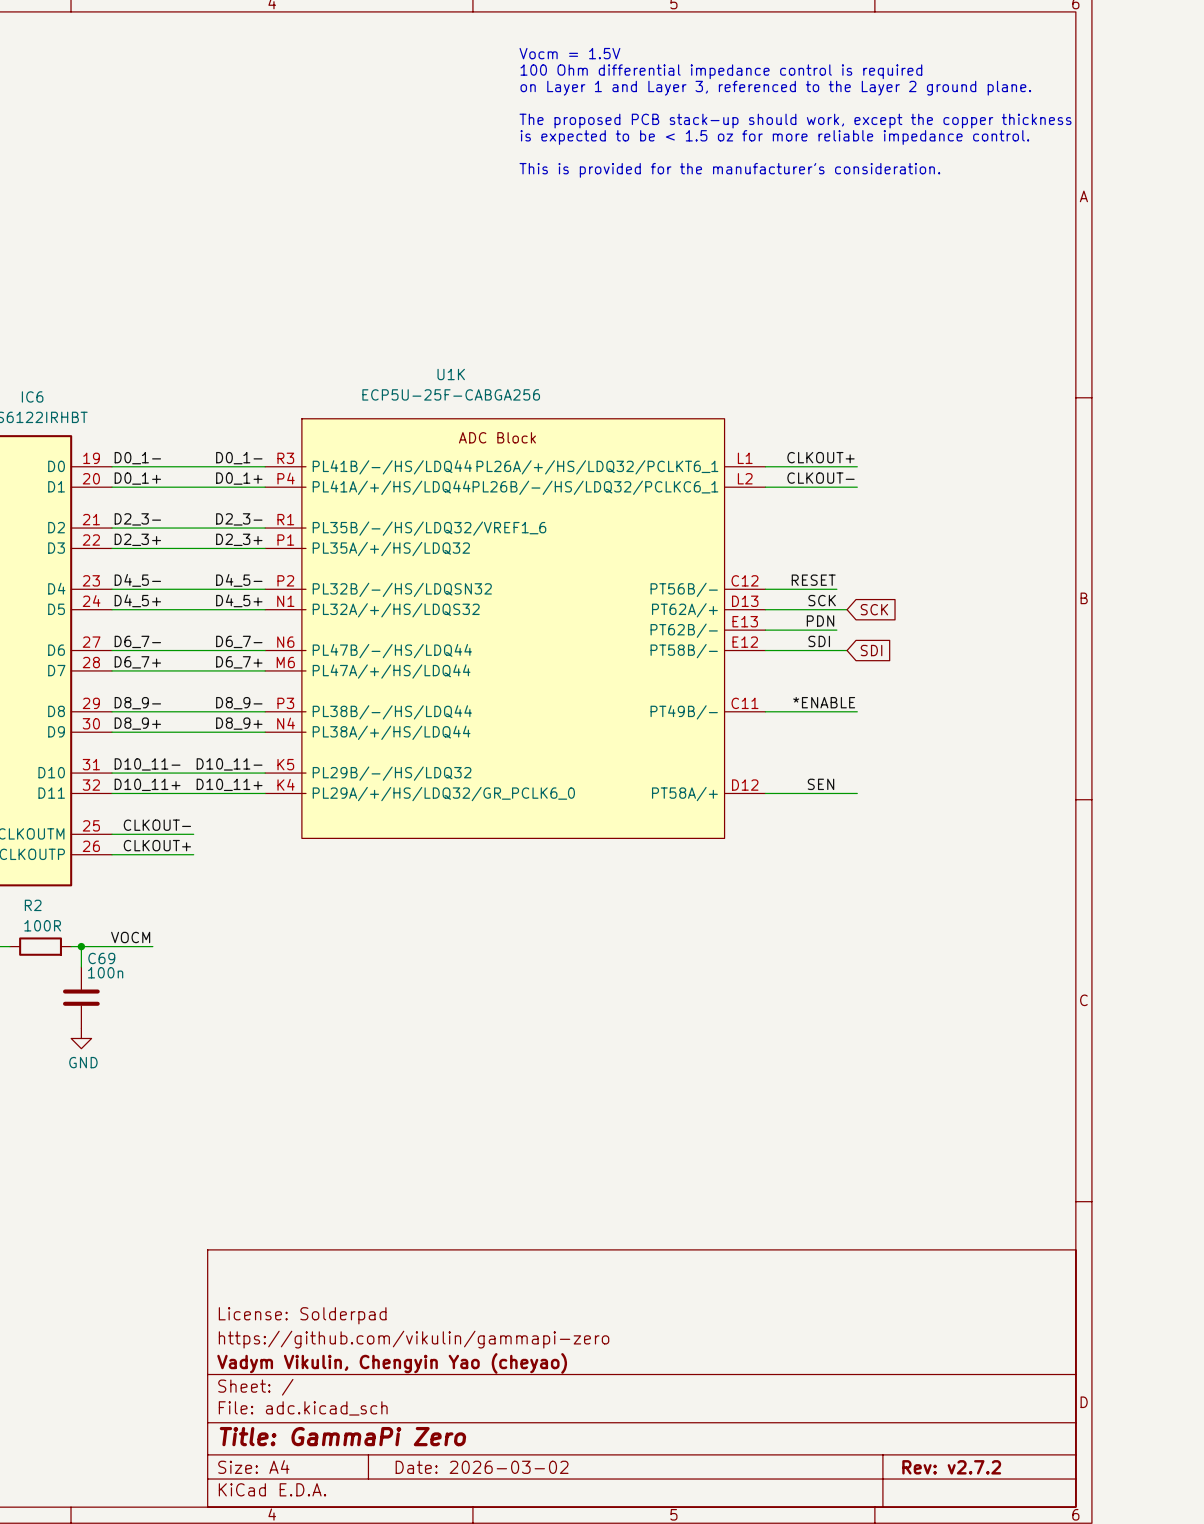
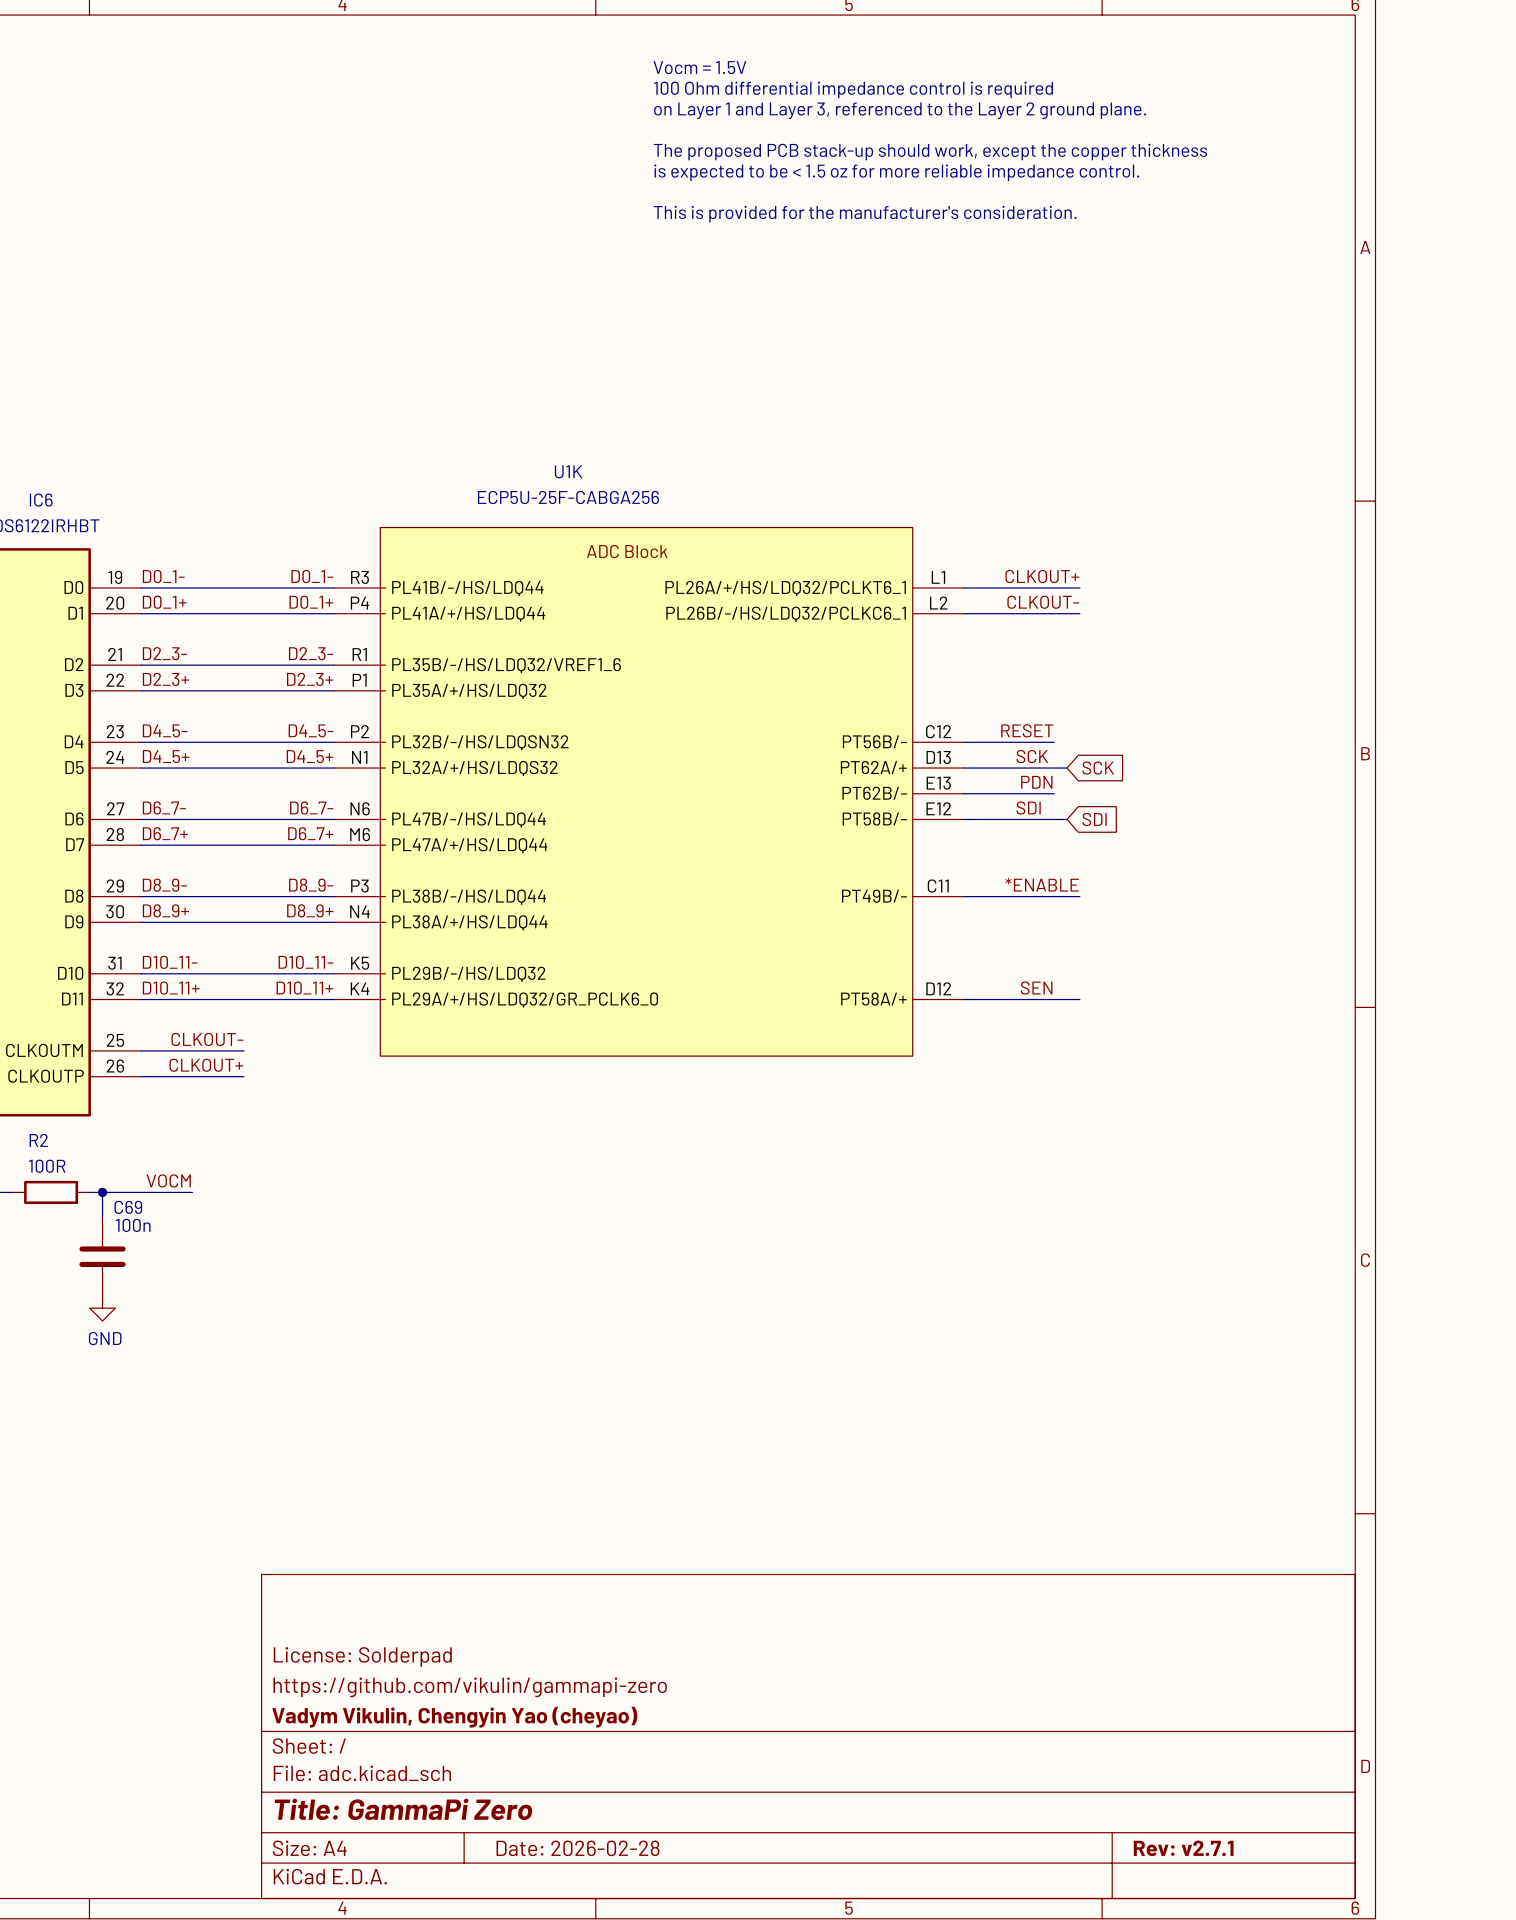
title block: Date: 2026-03-02 (482, 1467) -> Date: 2026-02-28 (578, 1848)
title block: Rev: v2.7.2 (951, 1467) -> Rev: v2.7.1 (1183, 1848)

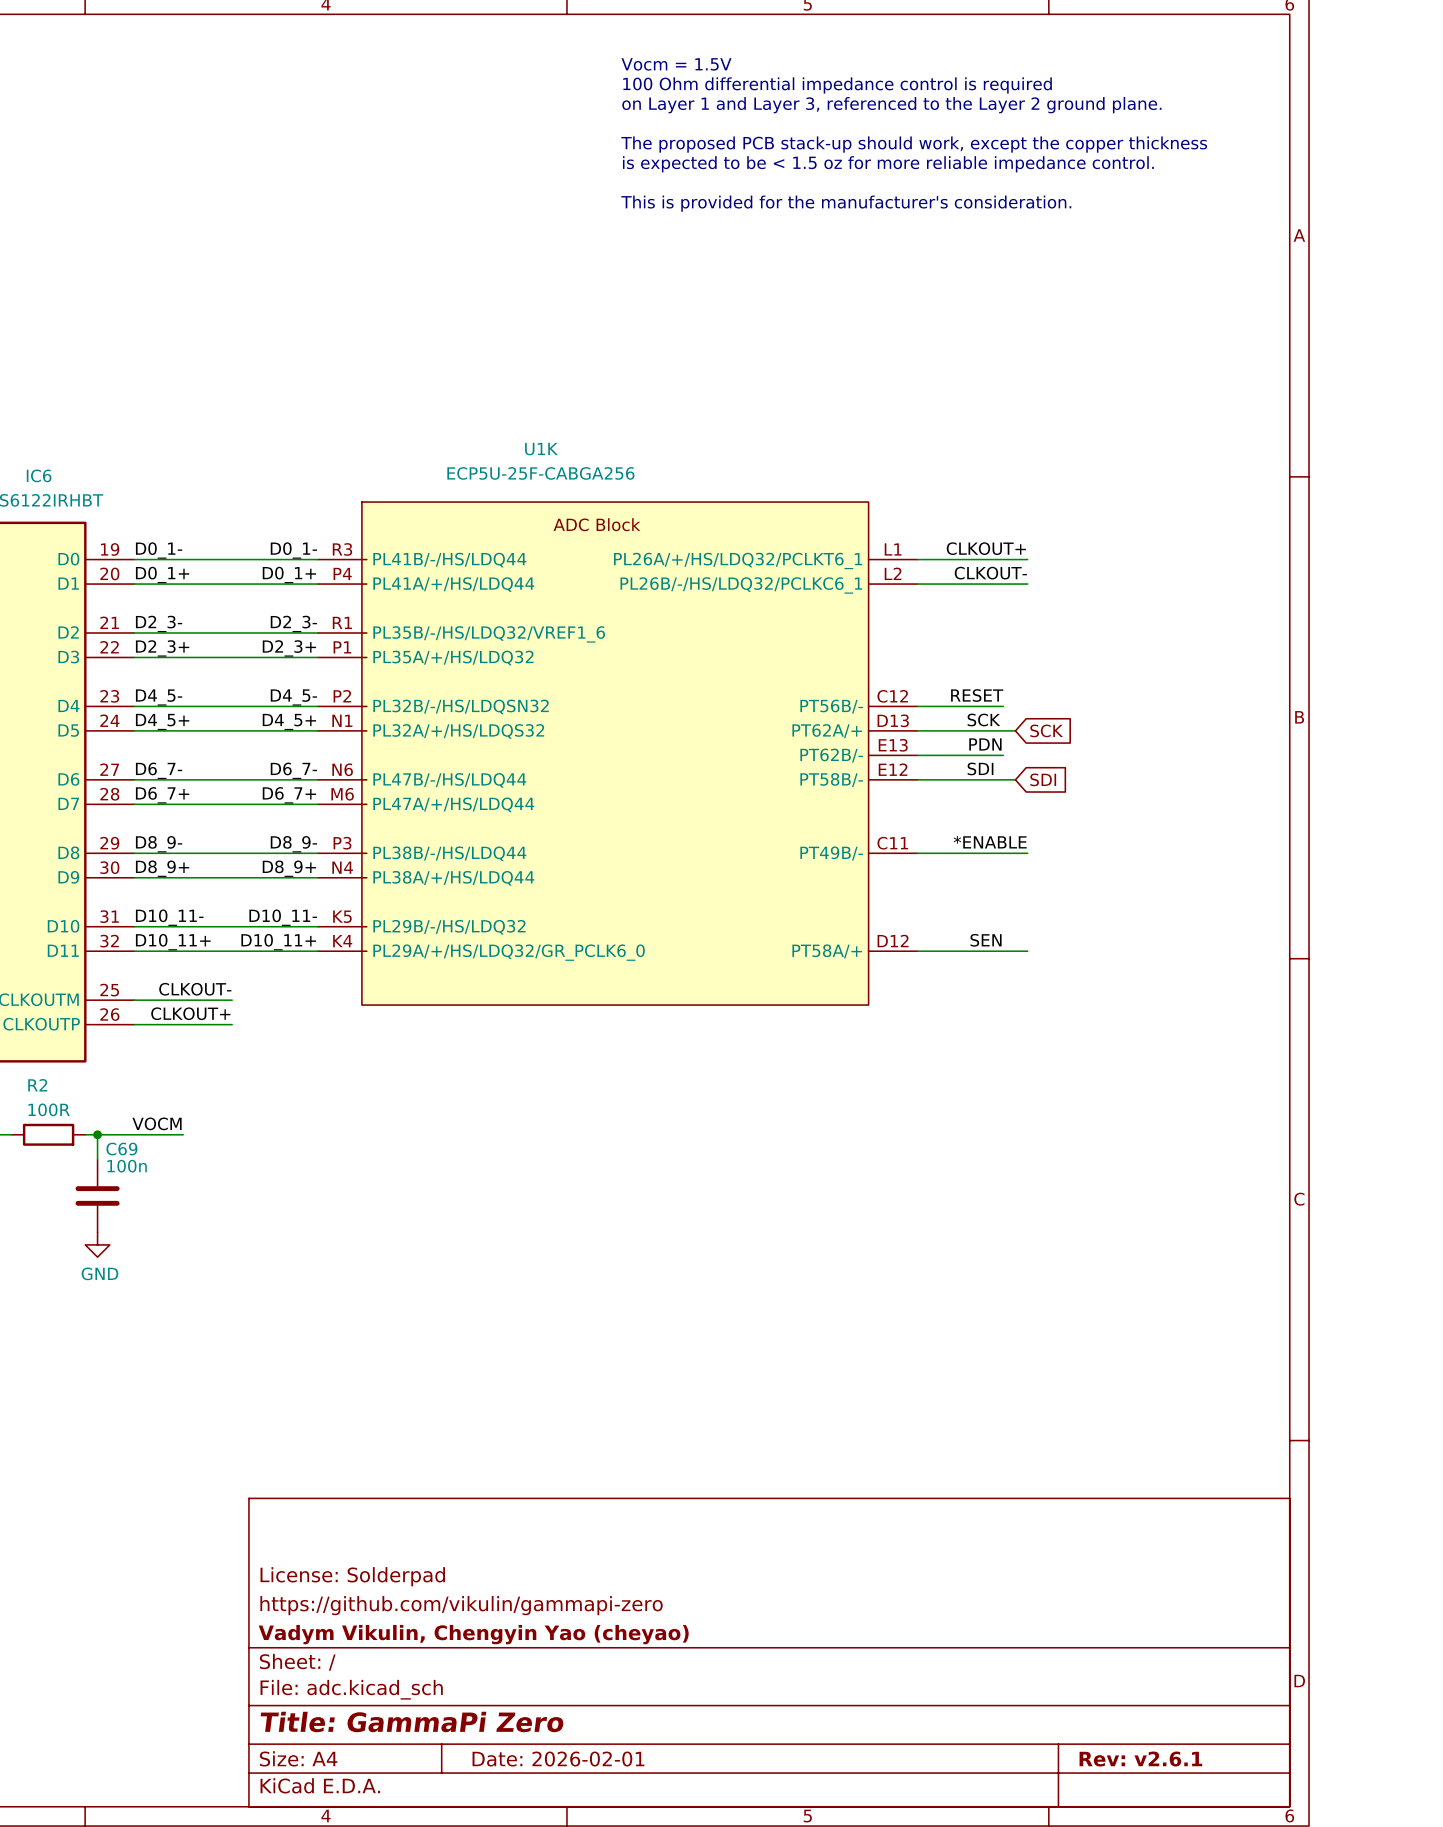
title block: Date: 2026-02-28 (578, 1848) -> Date: 2026-02-01 (558, 1759)
title block: Rev: v2.7.1 (1183, 1848) -> Rev: v2.6.1 (1140, 1759)

